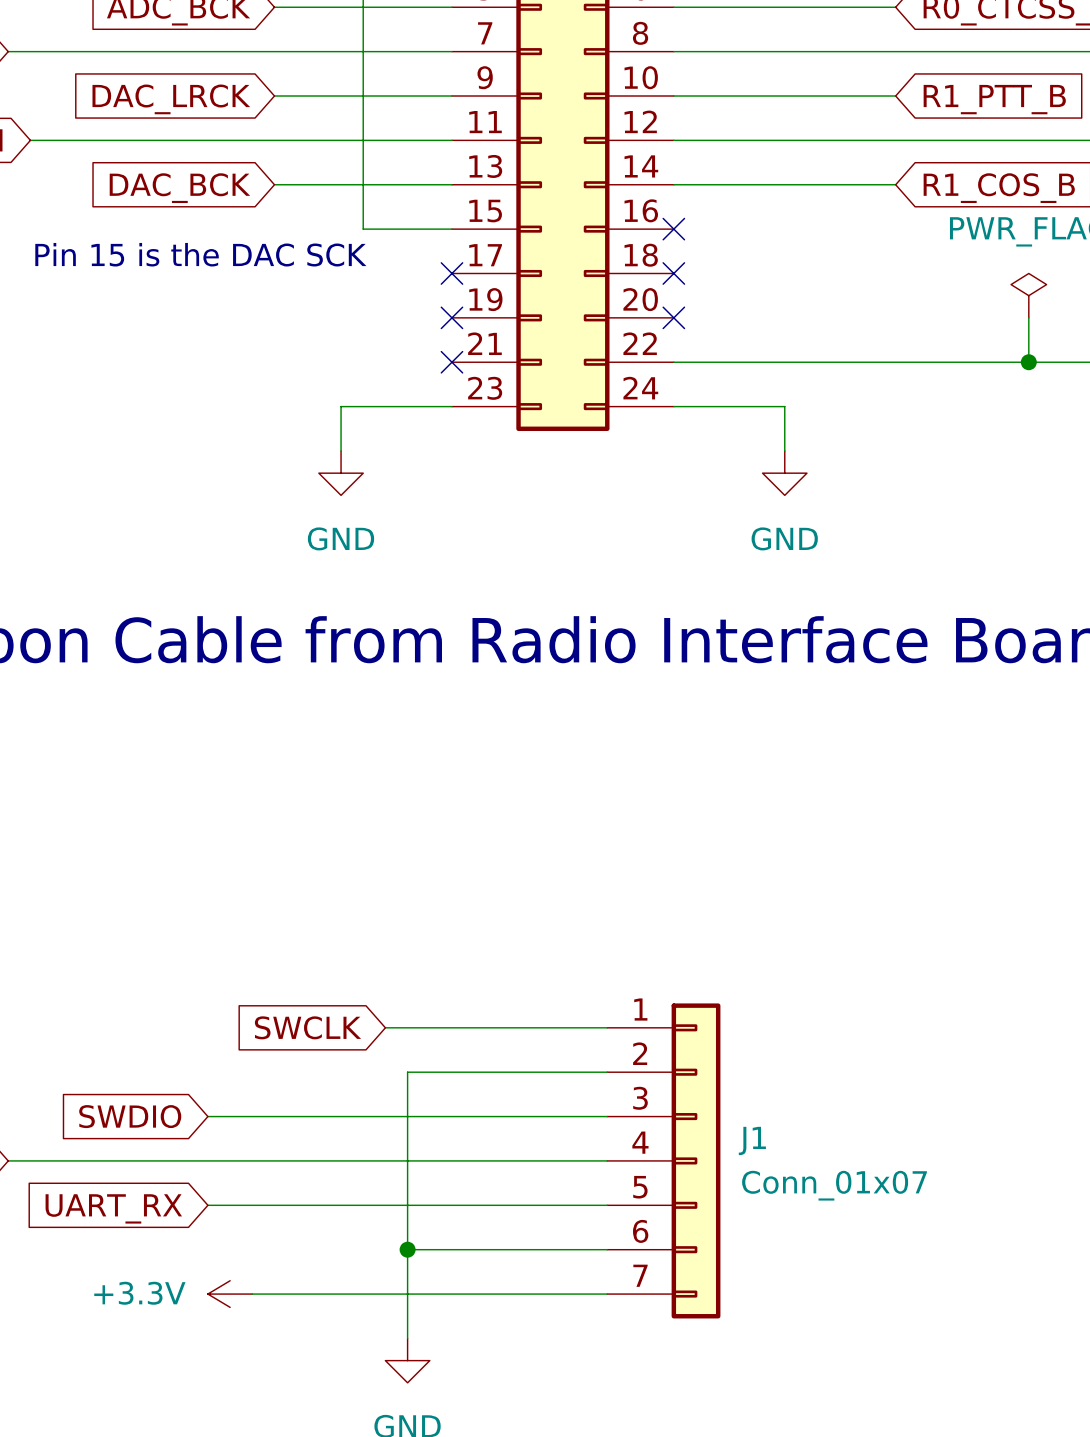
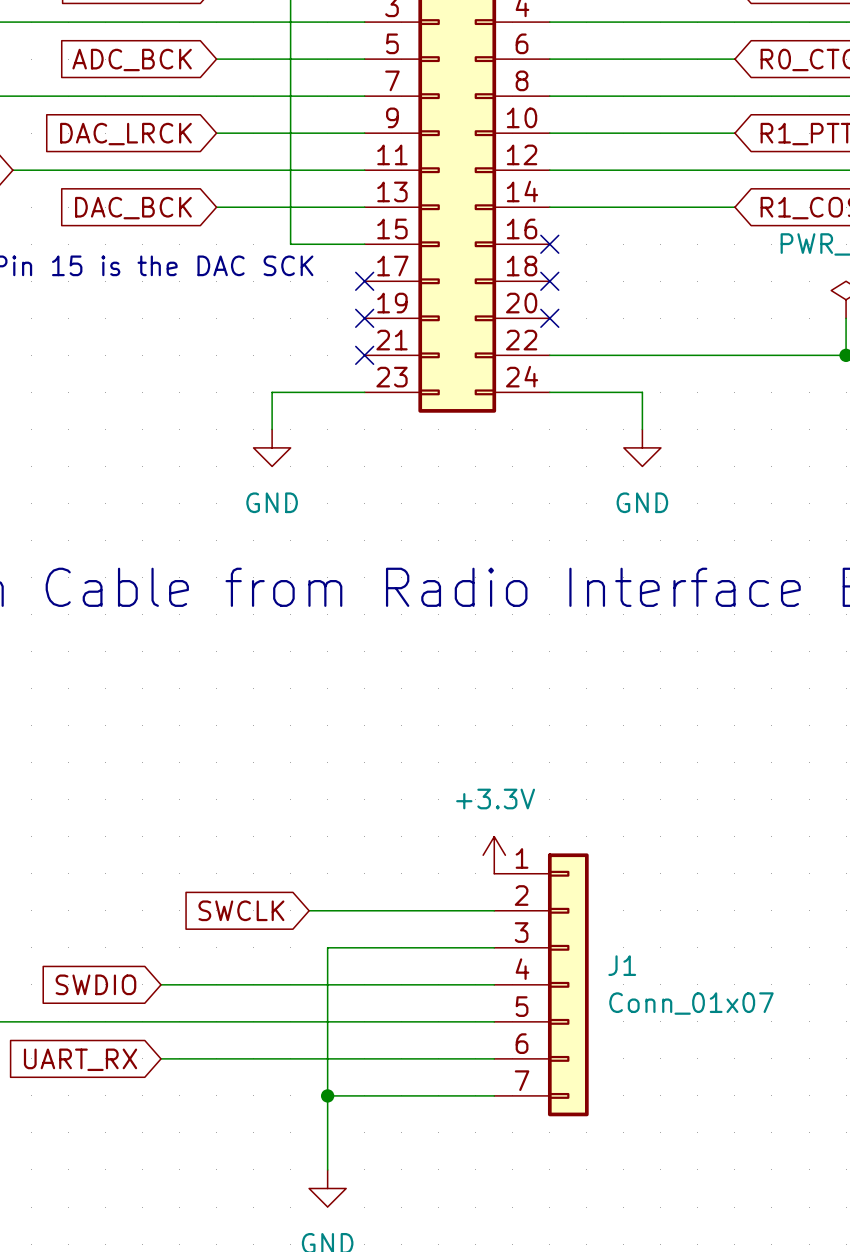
power symbol: none -> +3.3V (494, 855)
J1 position: (663, 1160) -> (541, 984)
power symbol: +3.3V (230, 1294) -> none
wire: (252, 1294) (607, 1294) -> none

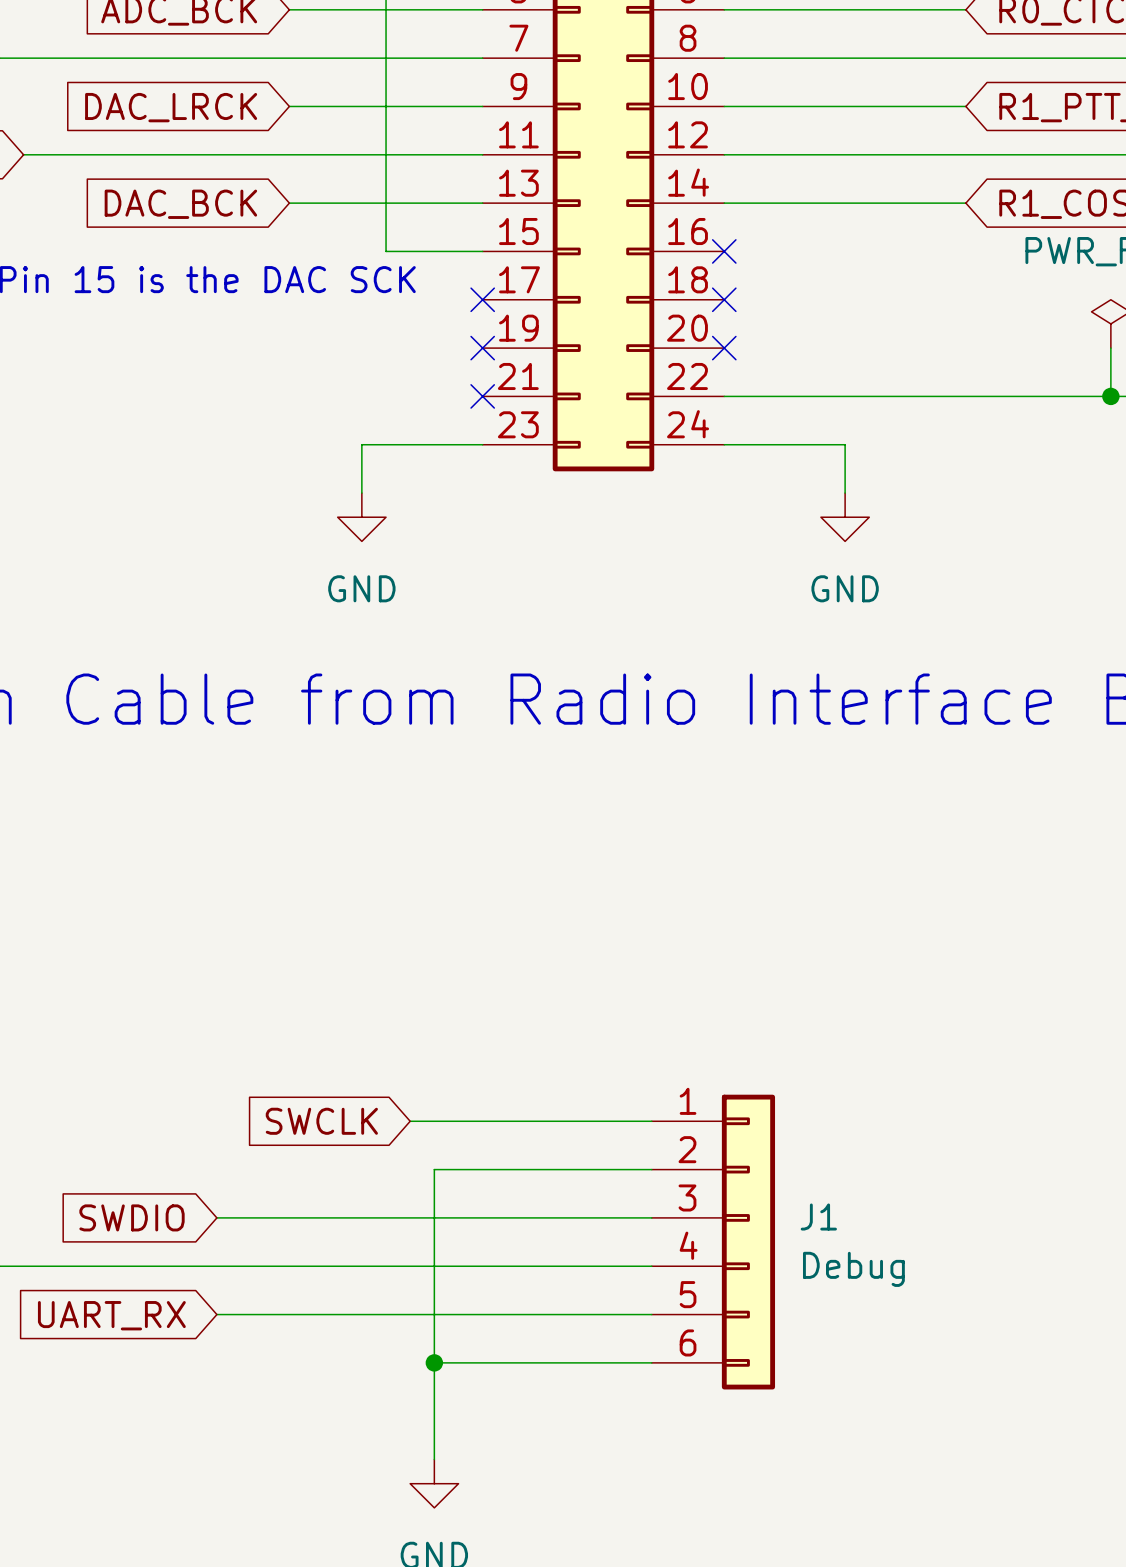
J1 symbol: [494, 853, 589, 1117] -> [651, 1094, 776, 1390]
power symbol: +3.3V (494, 855) -> none
J1 value: Conn_01x07 (691, 1003) -> Debug (853, 1269)

